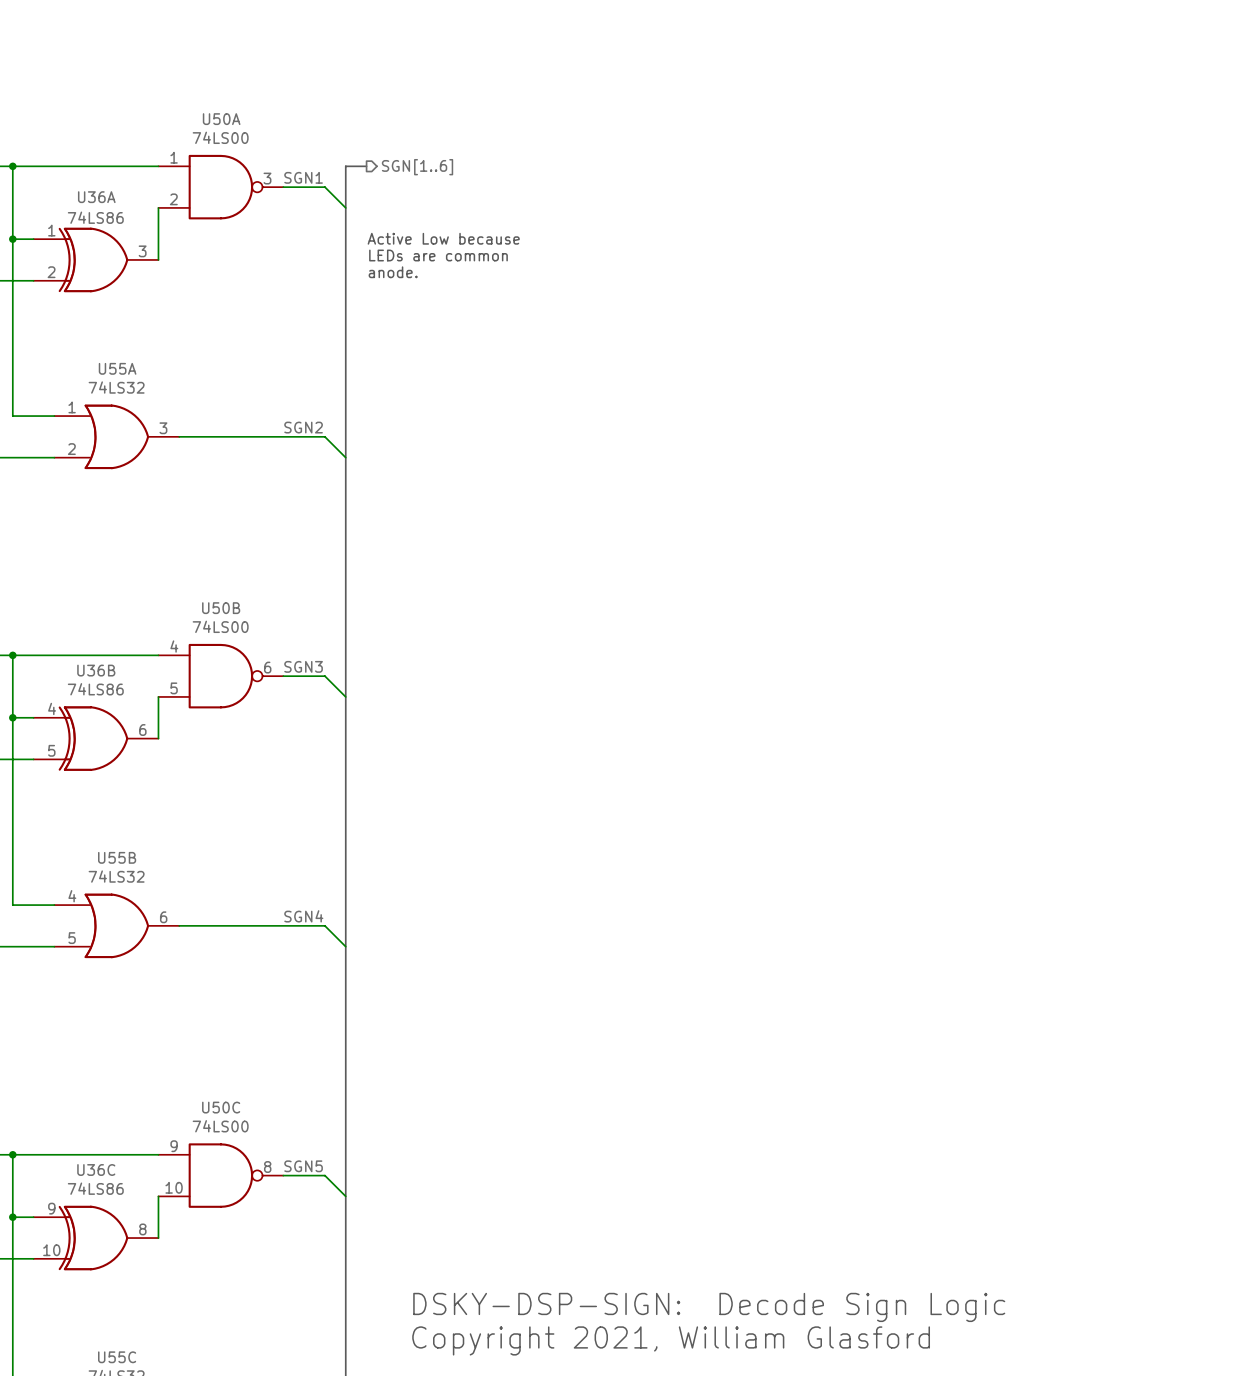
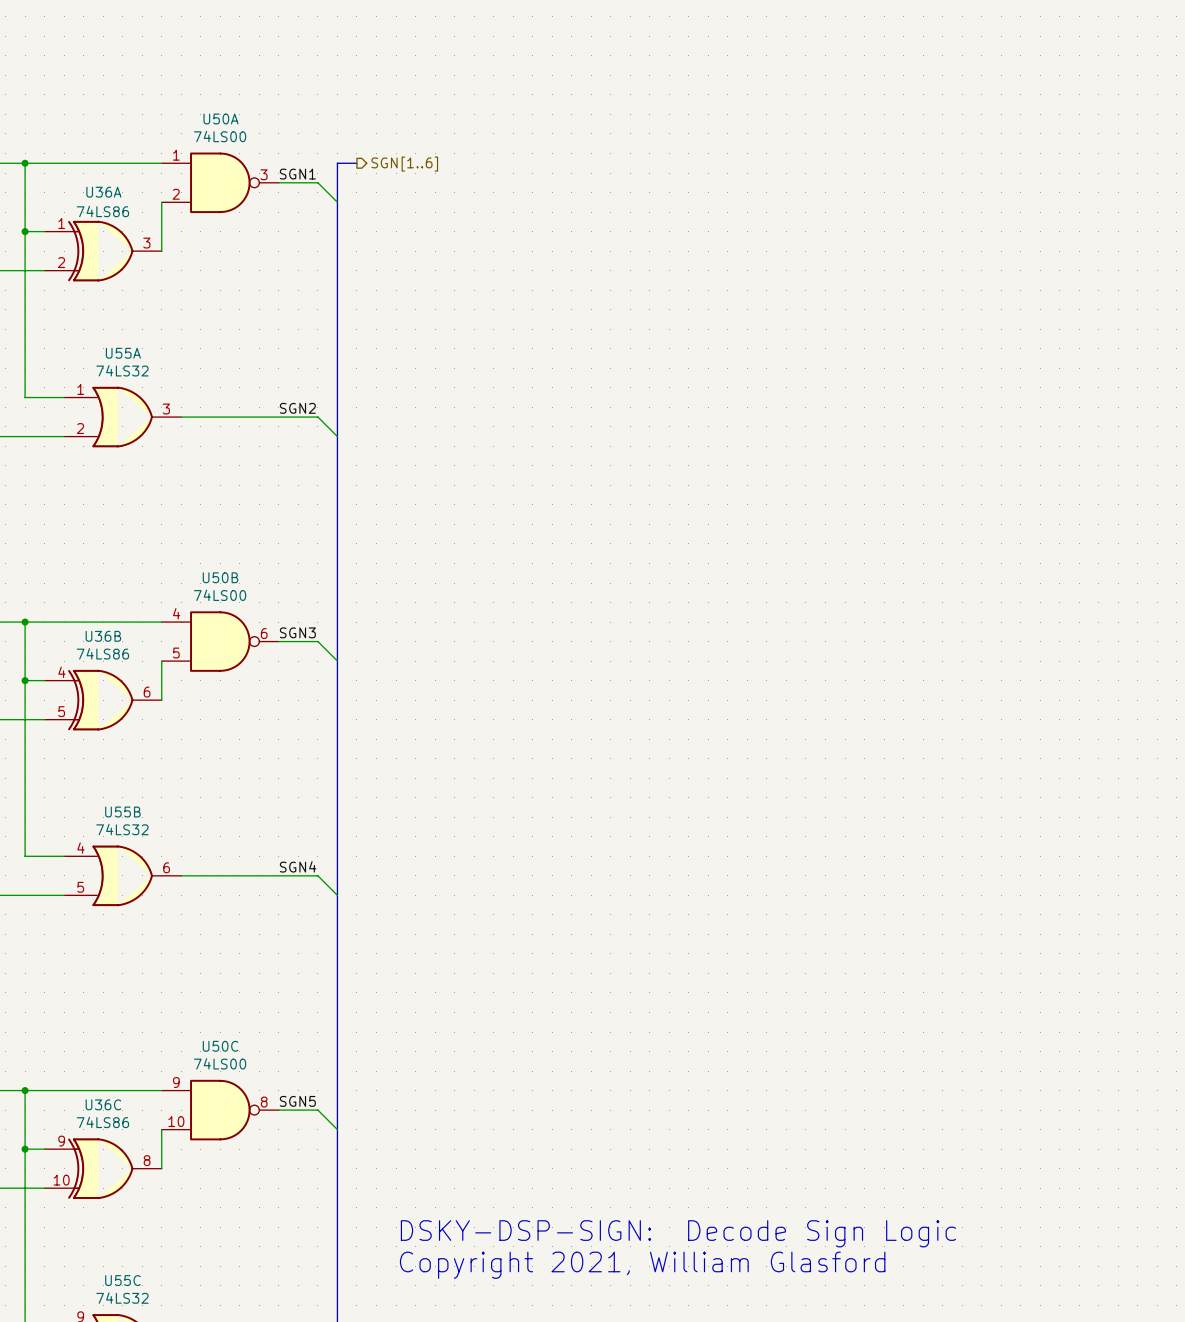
text: Active Low because (443, 238) -> none
text: LEDs are common (438, 255) -> none
text: anode. (393, 272) -> none

